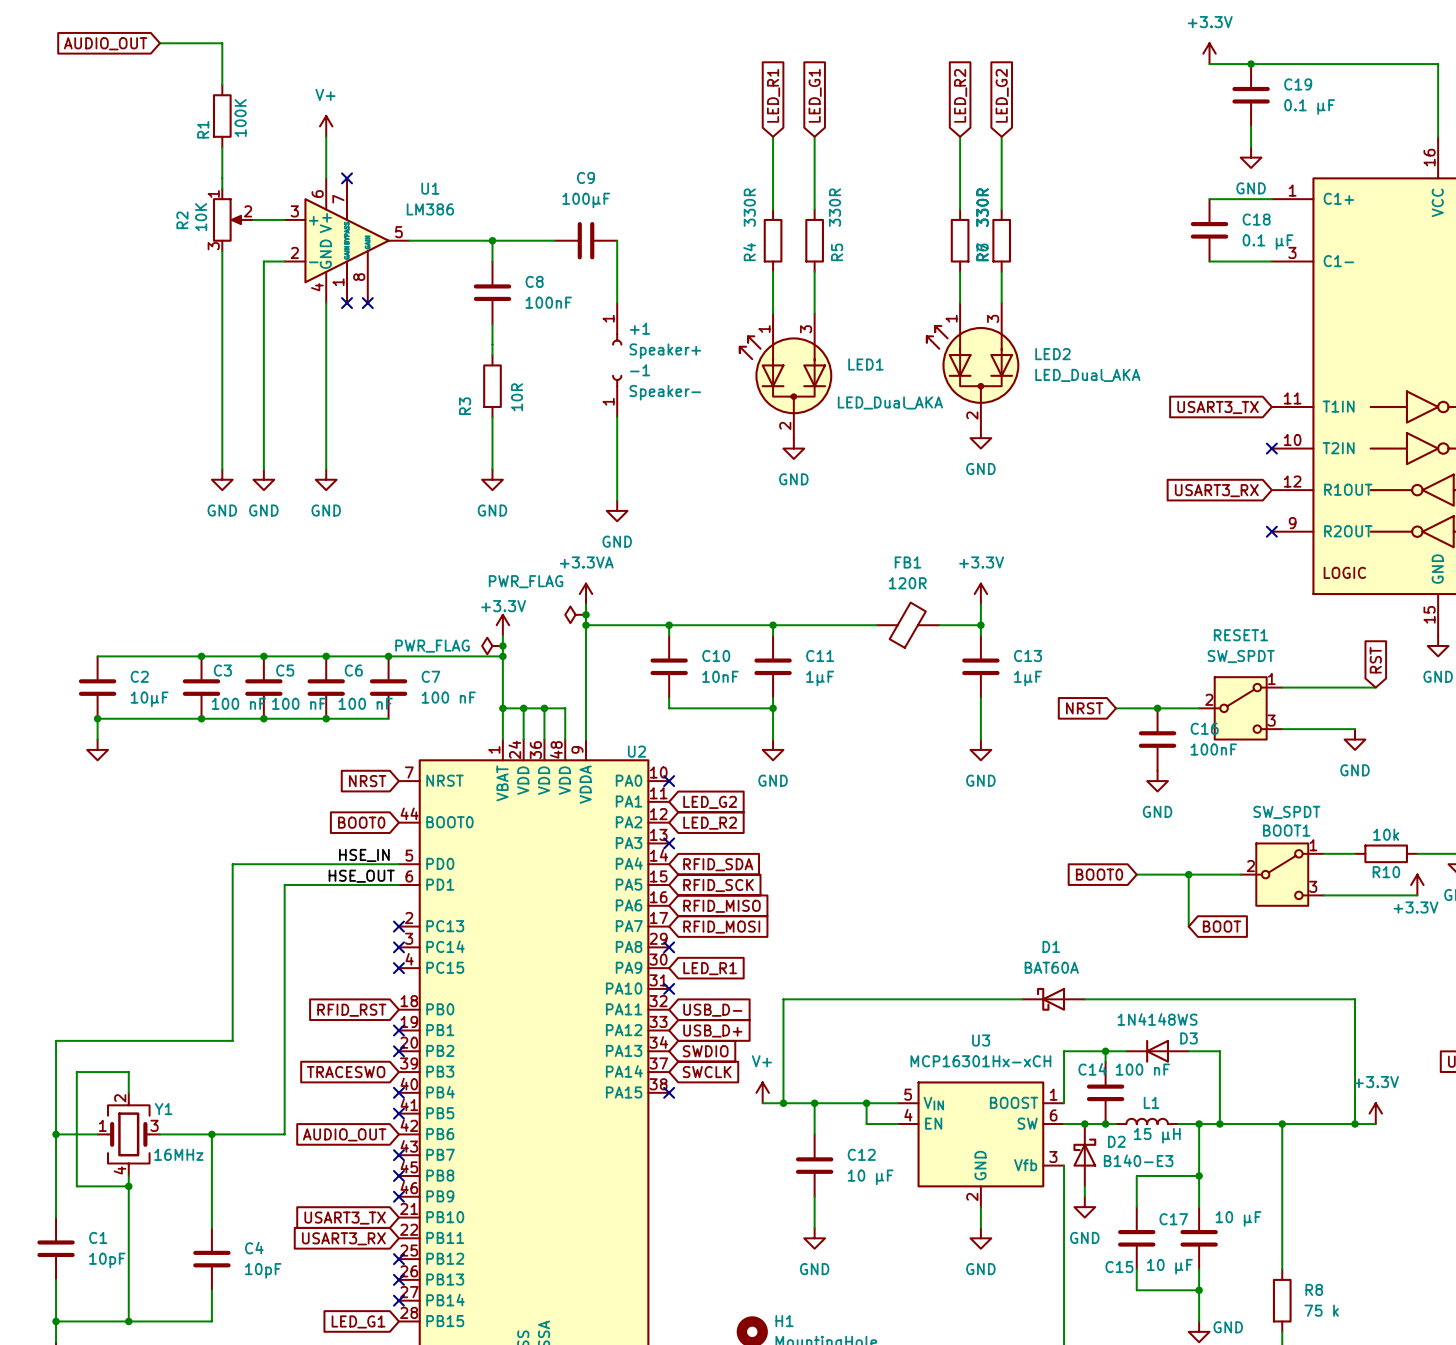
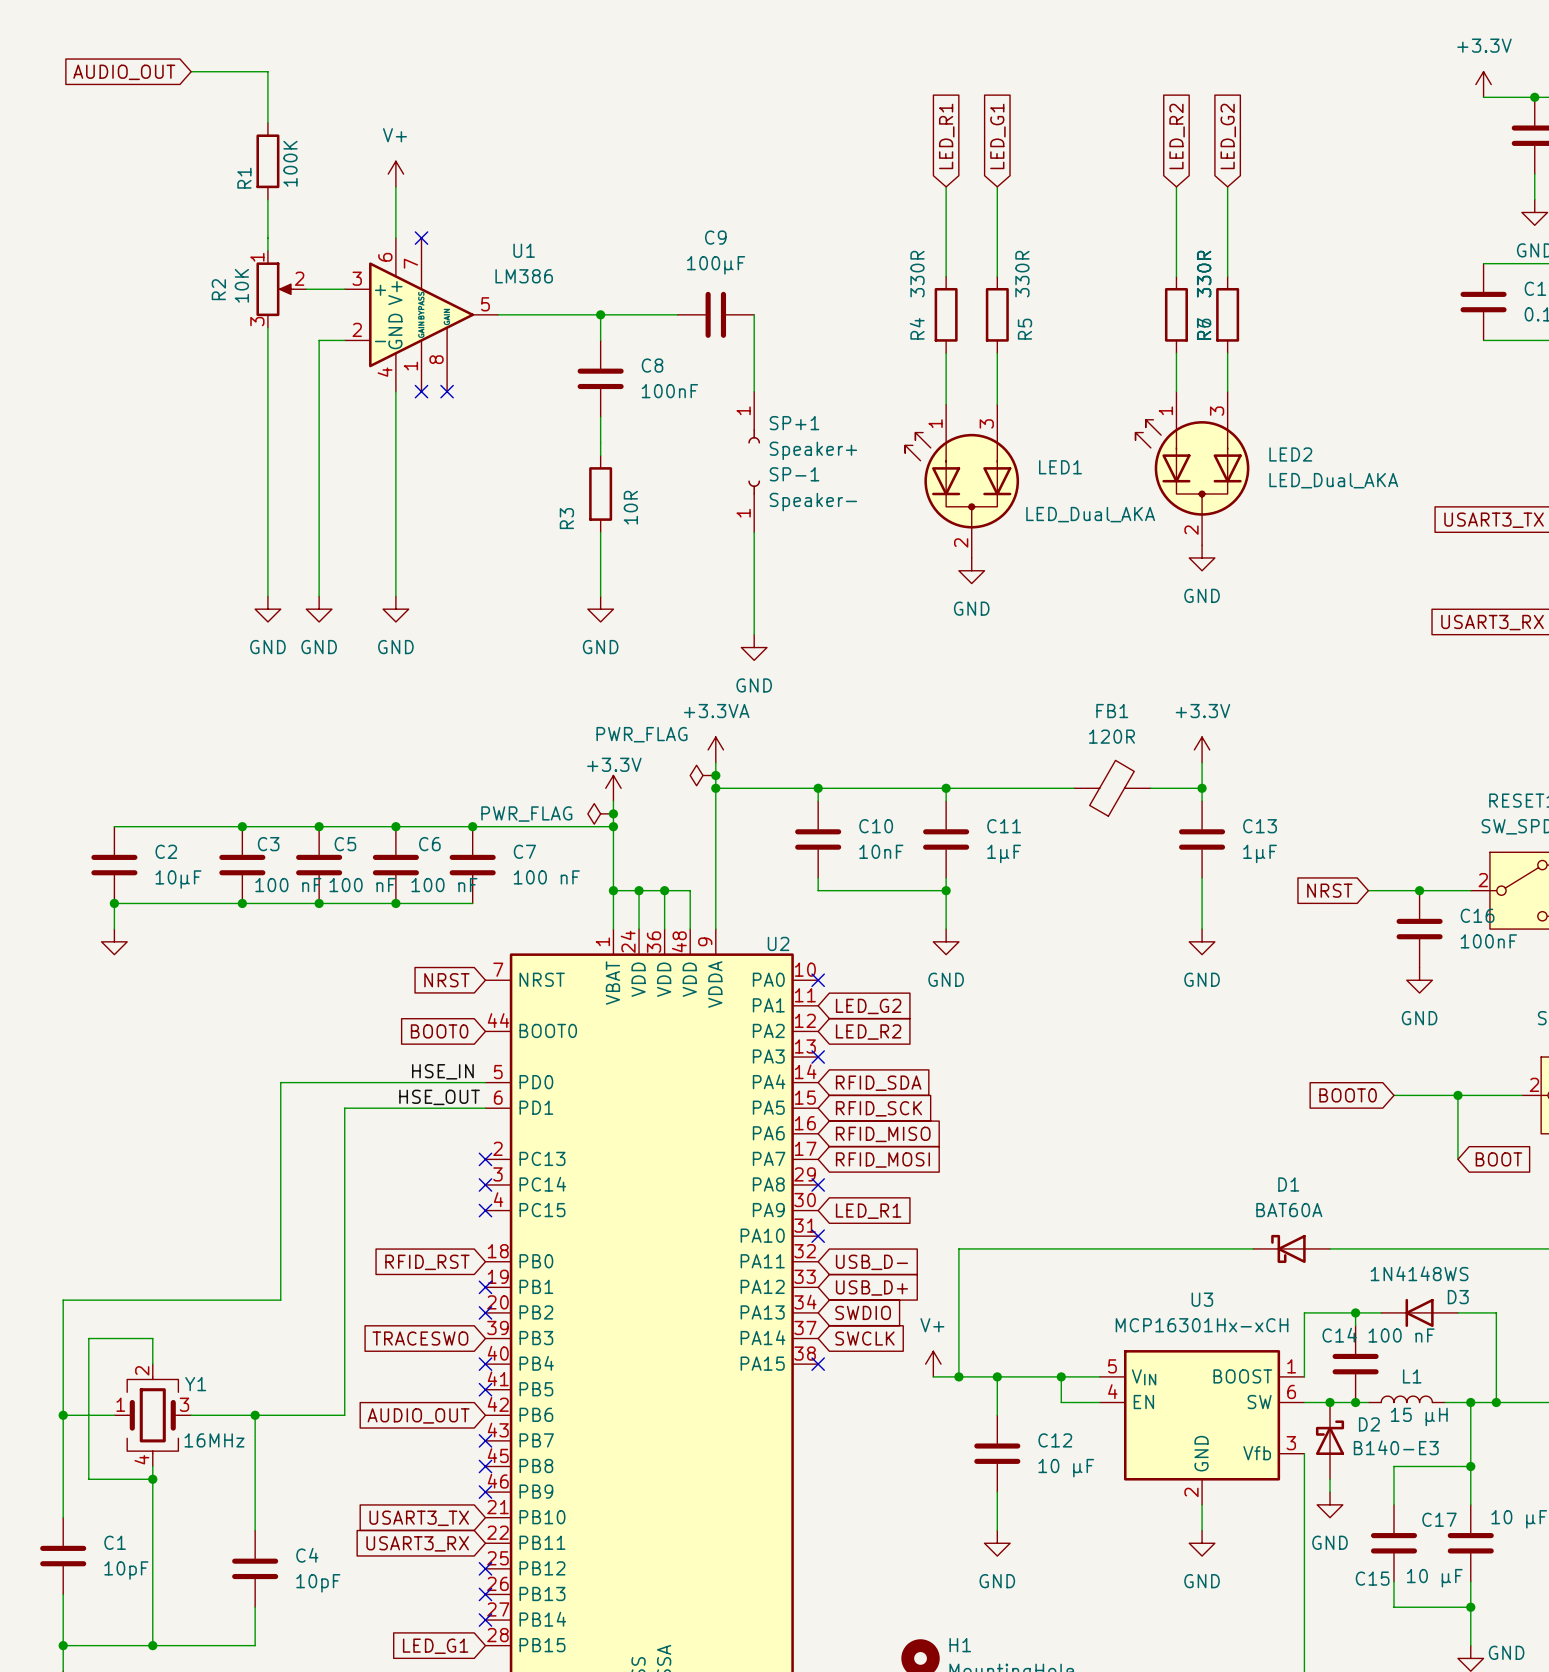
+1 name: +1 (640, 328) -> SP+1 (794, 423)
-1 name: -1 (640, 370) -> SP-1 (794, 474)

